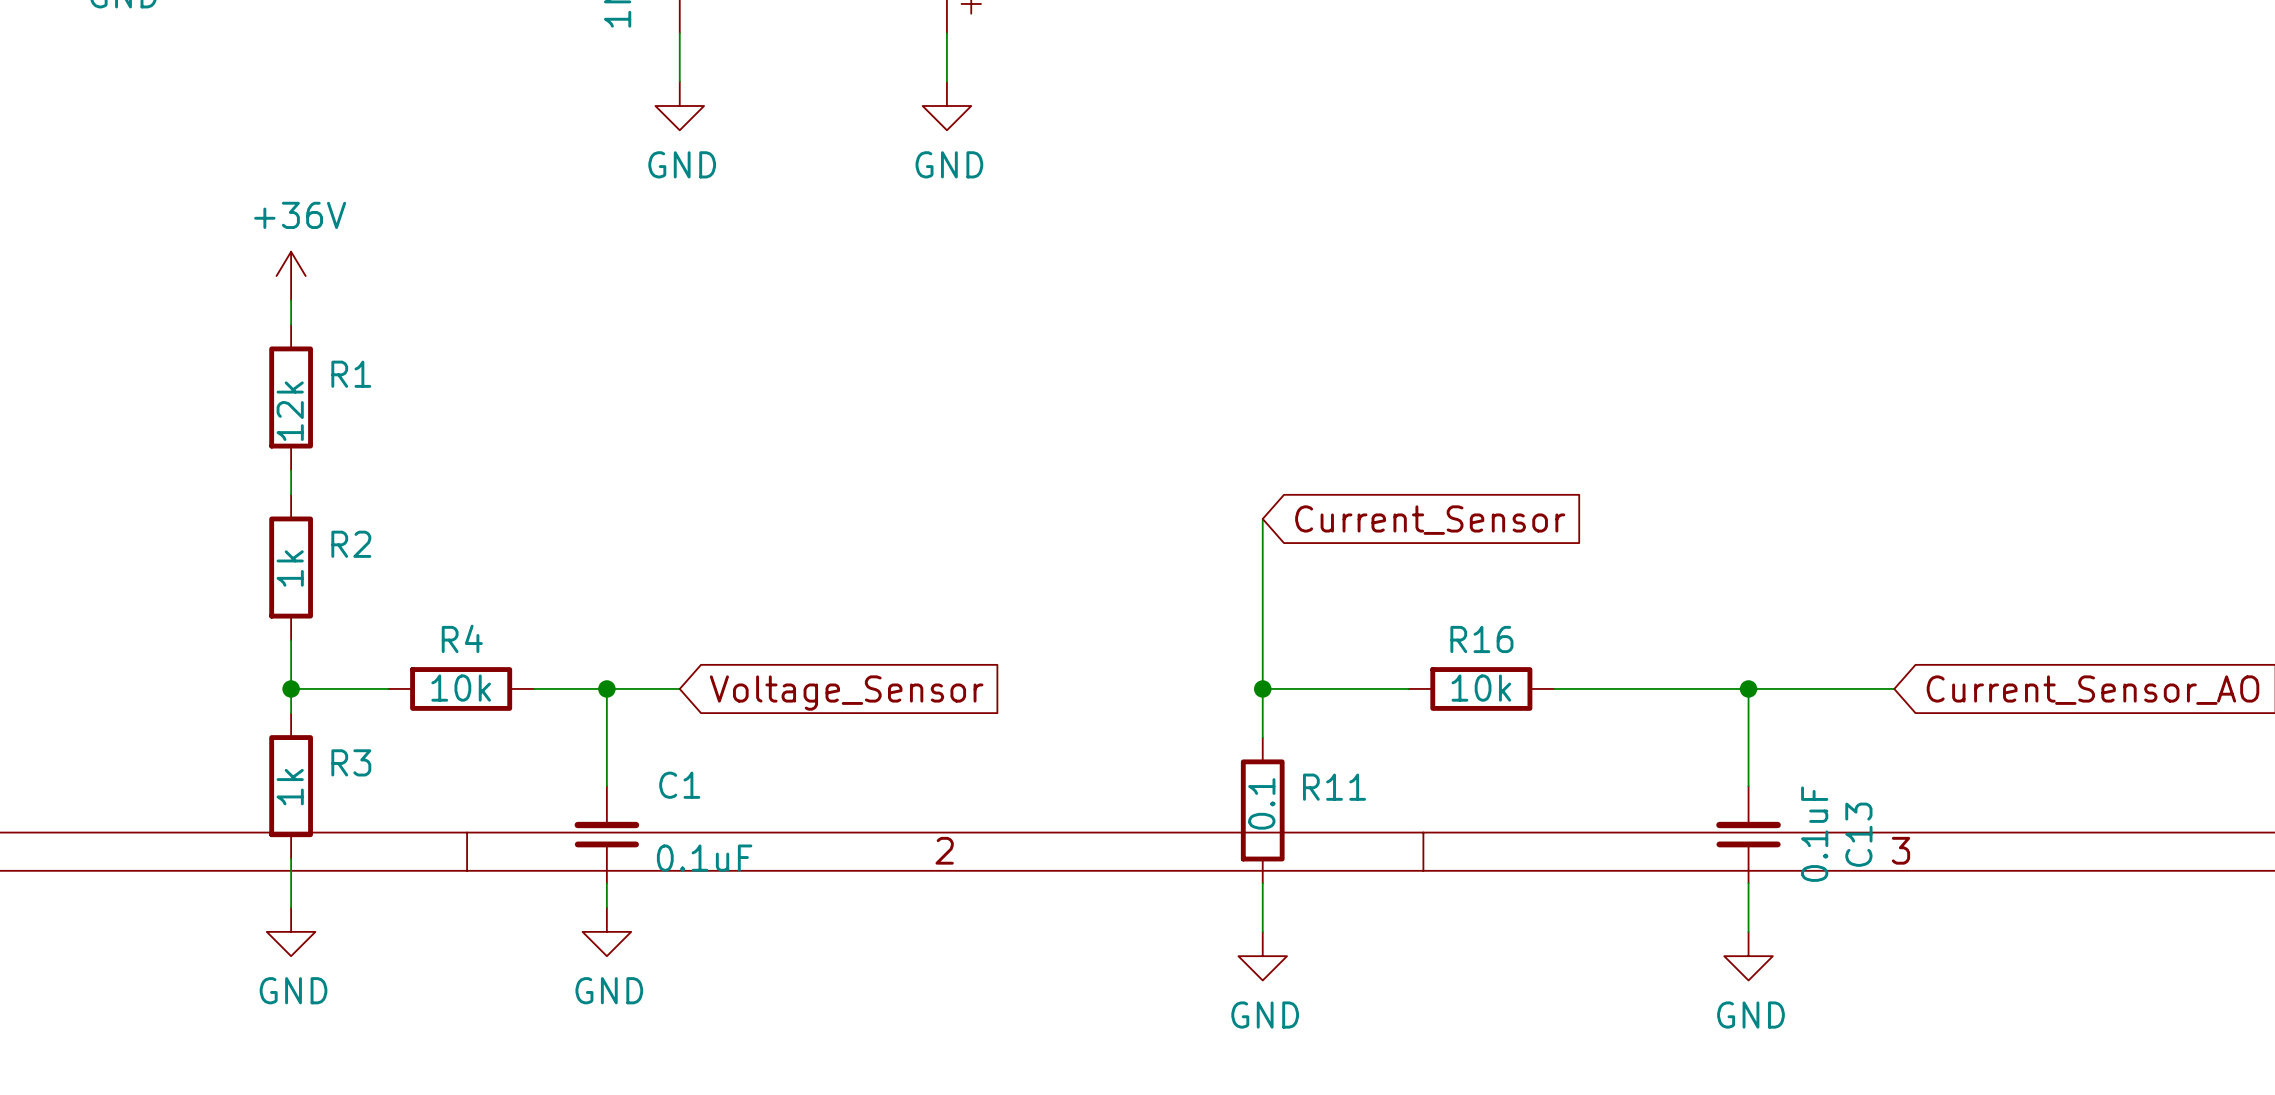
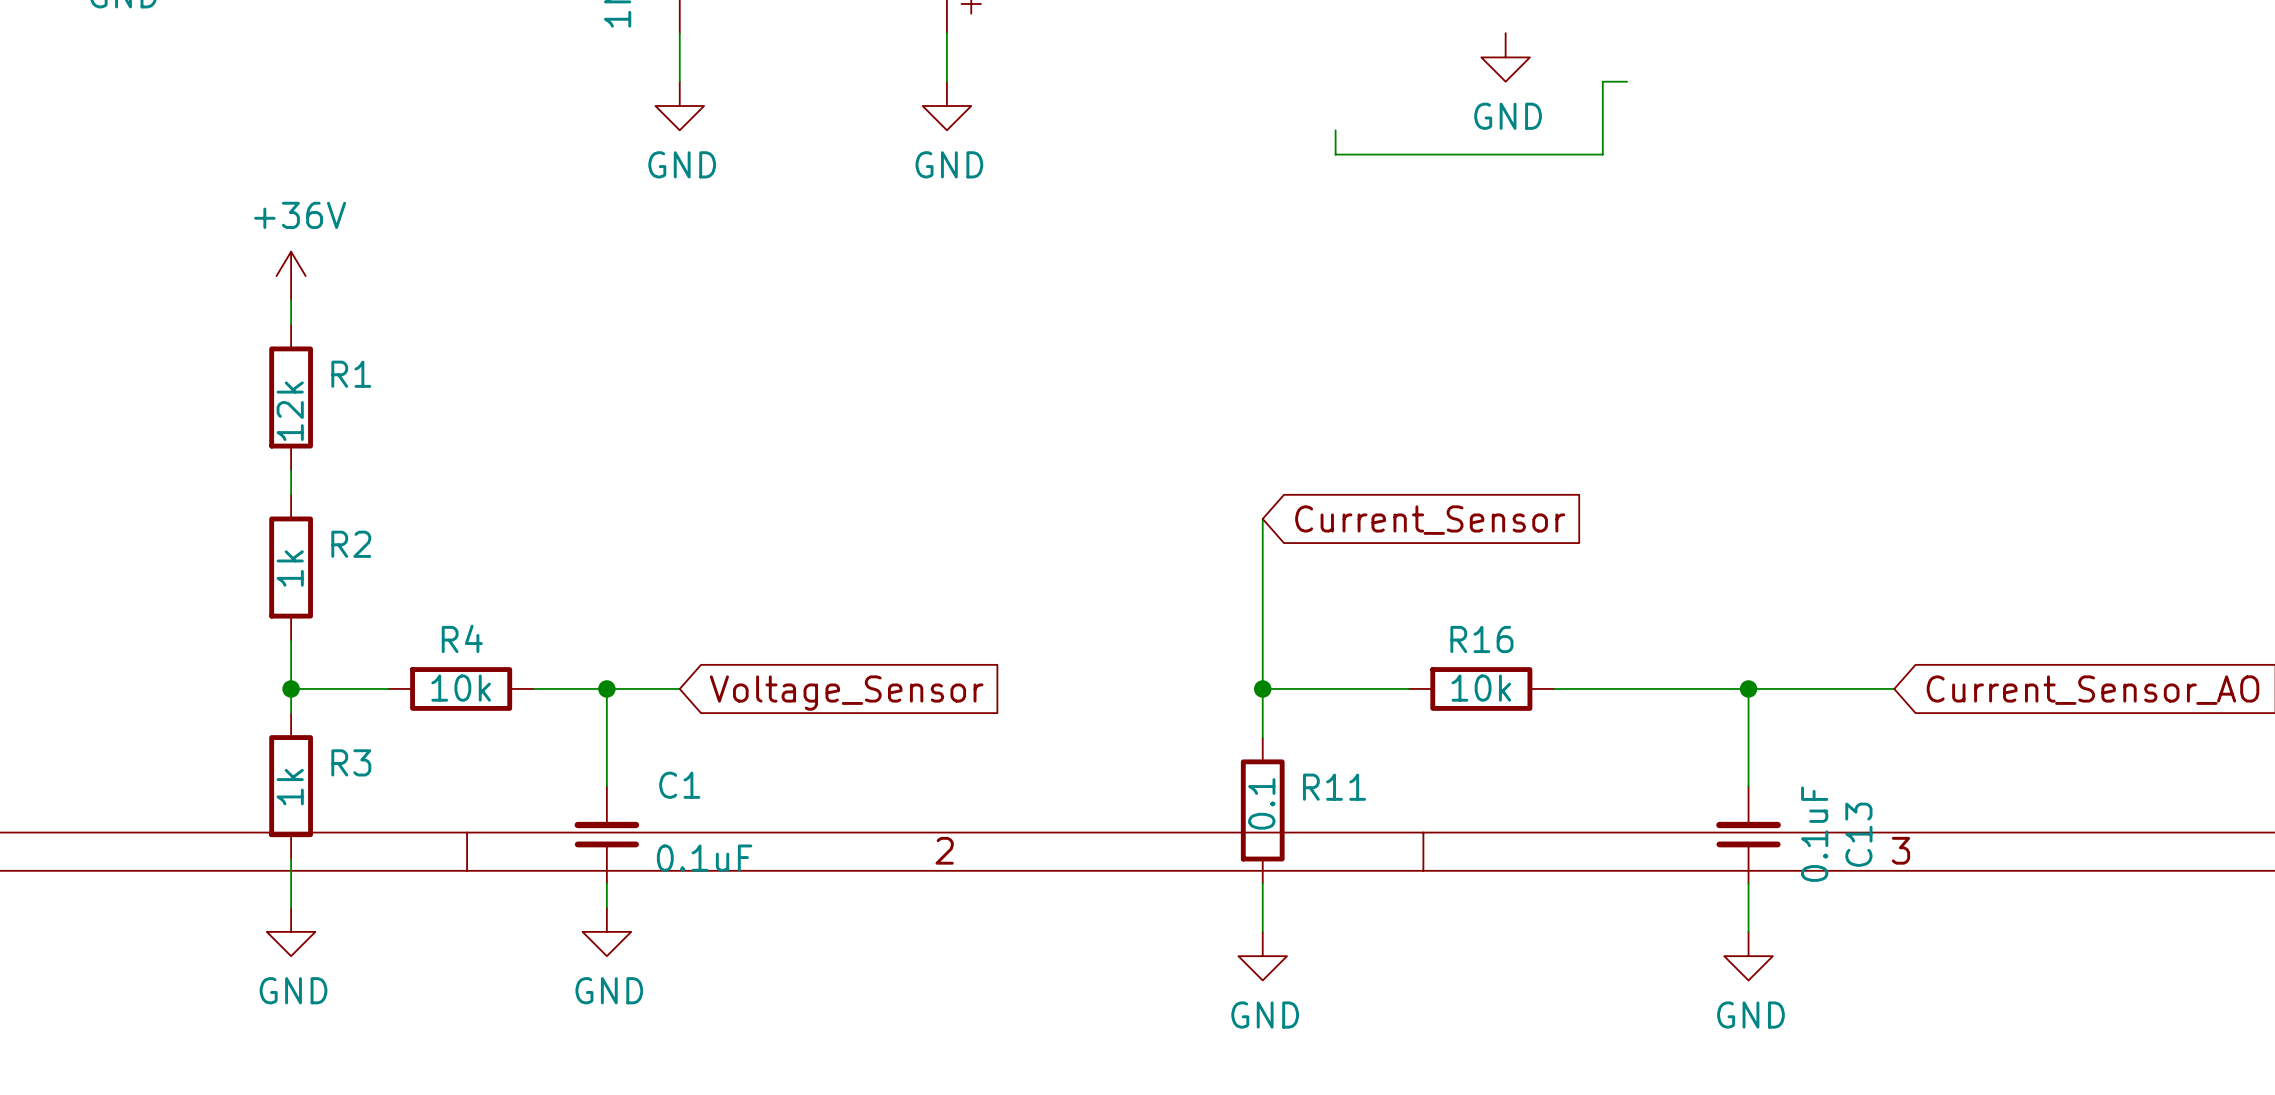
power symbol: none -> GND (1505, 57)
wire: none -> (1627, 81) (1602, 81) (1602, 154) (1335, 154) (1335, 130)

